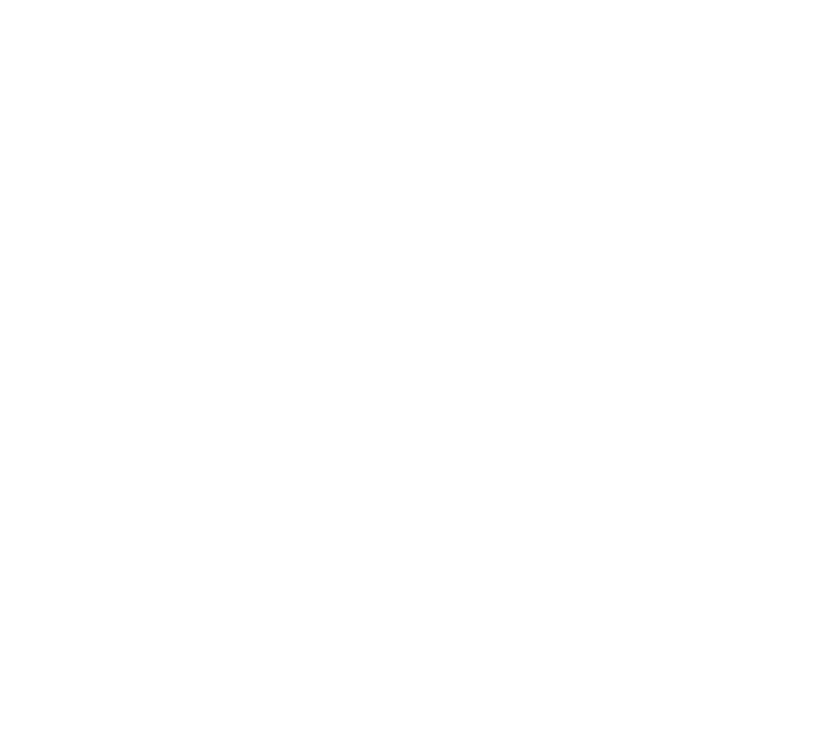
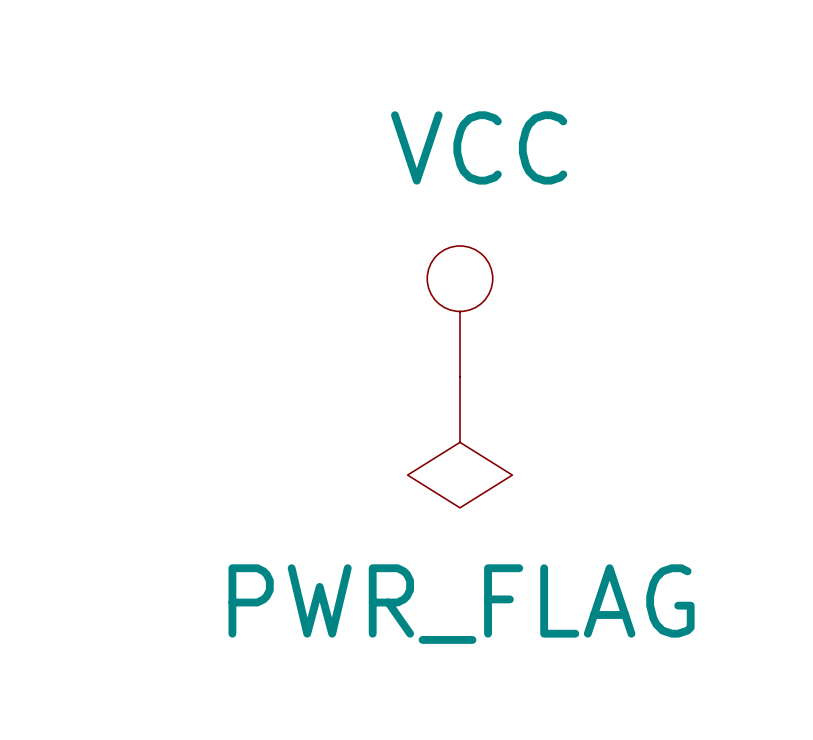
power symbol: none -> VCC (459, 311)
power symbol: none -> PWR_FLAG (459, 442)

